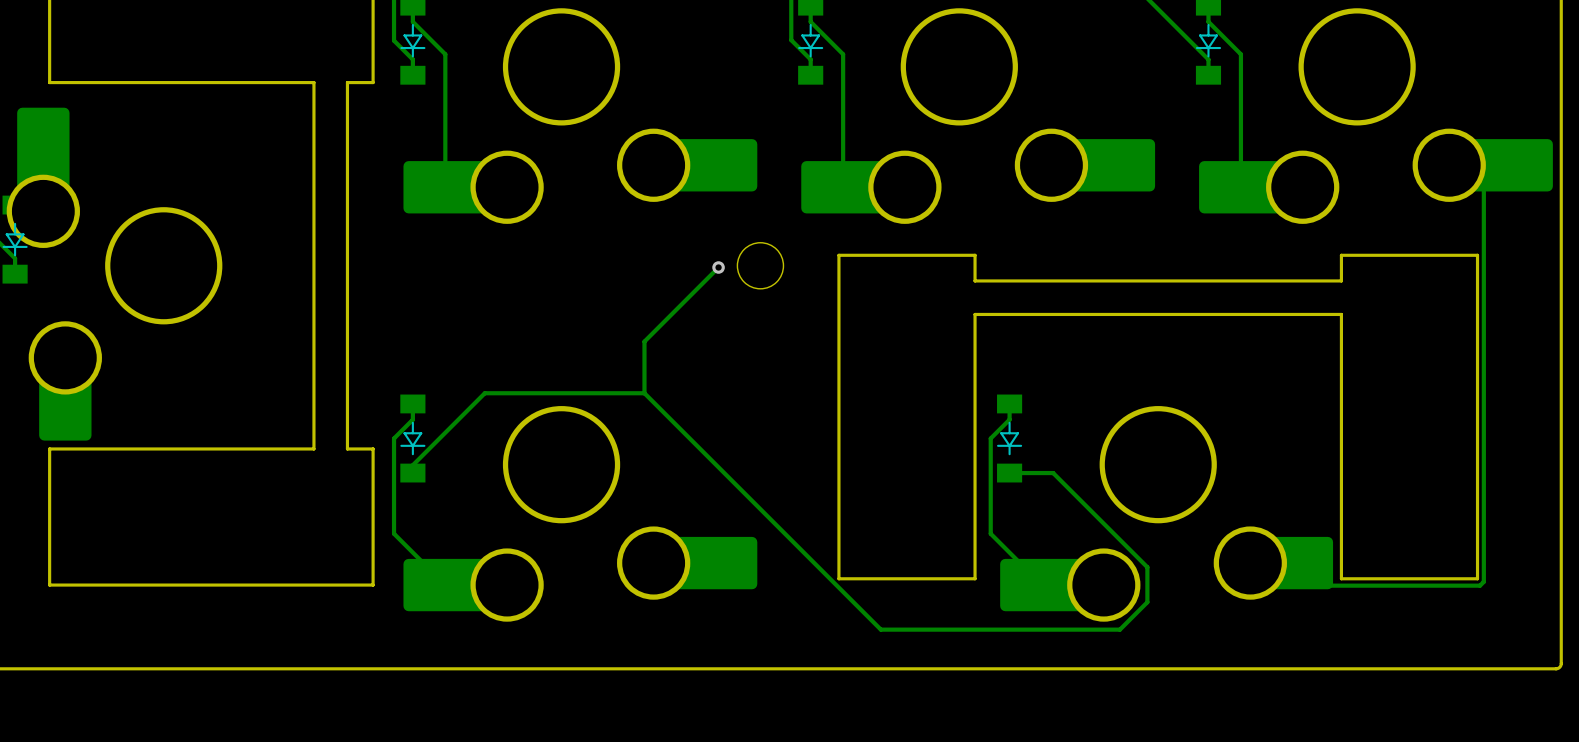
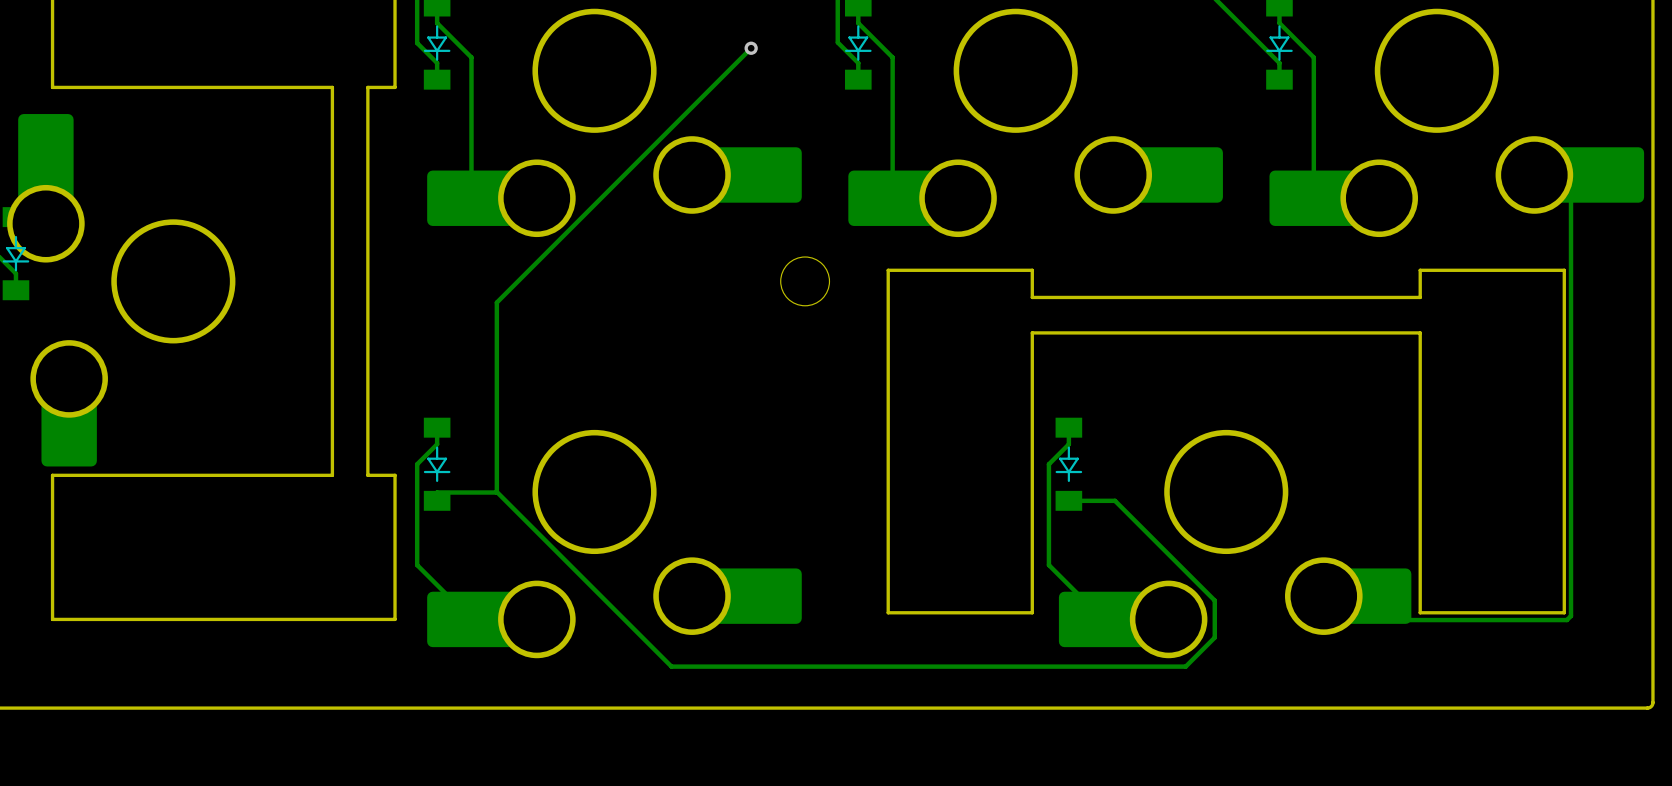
track: none -> (751, 48) (496, 302) (496, 491)
via: none -> (751, 48)
track: (718, 267) (644, 341) (644, 393) -> none
via: (718, 267) -> none
track: (644, 393) (880, 629) -> (496, 491) (671, 666) (932, 666)
track: (644, 393) (484, 393) (412, 465) -> (496, 491) (437, 492)

